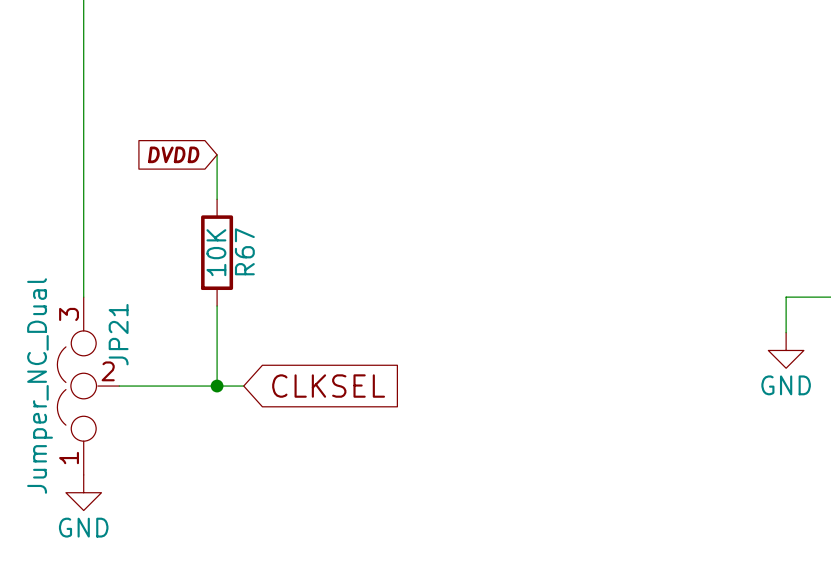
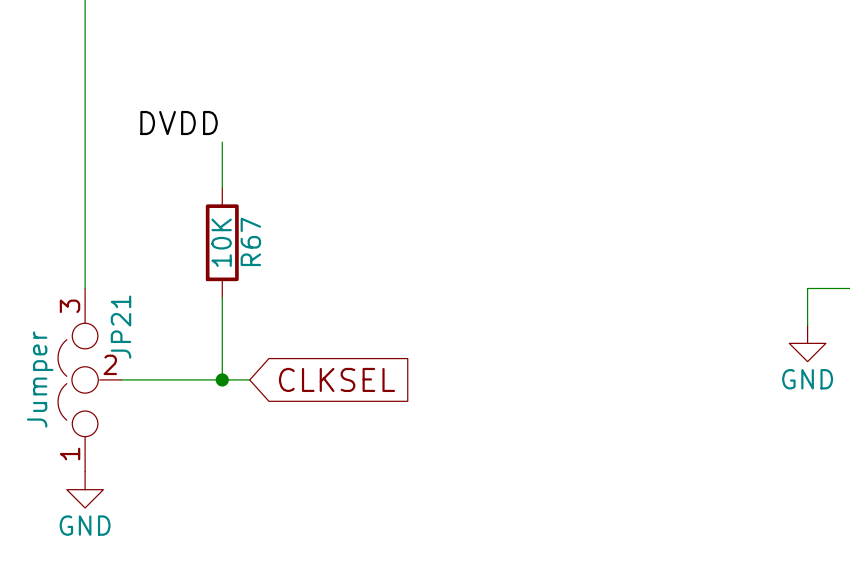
label: none -> DVDD (179, 123)
global label: DVDD (173, 154) -> none
JP21 value: Jumper_NC_Dual (40, 386) -> Jumper (40, 379)

